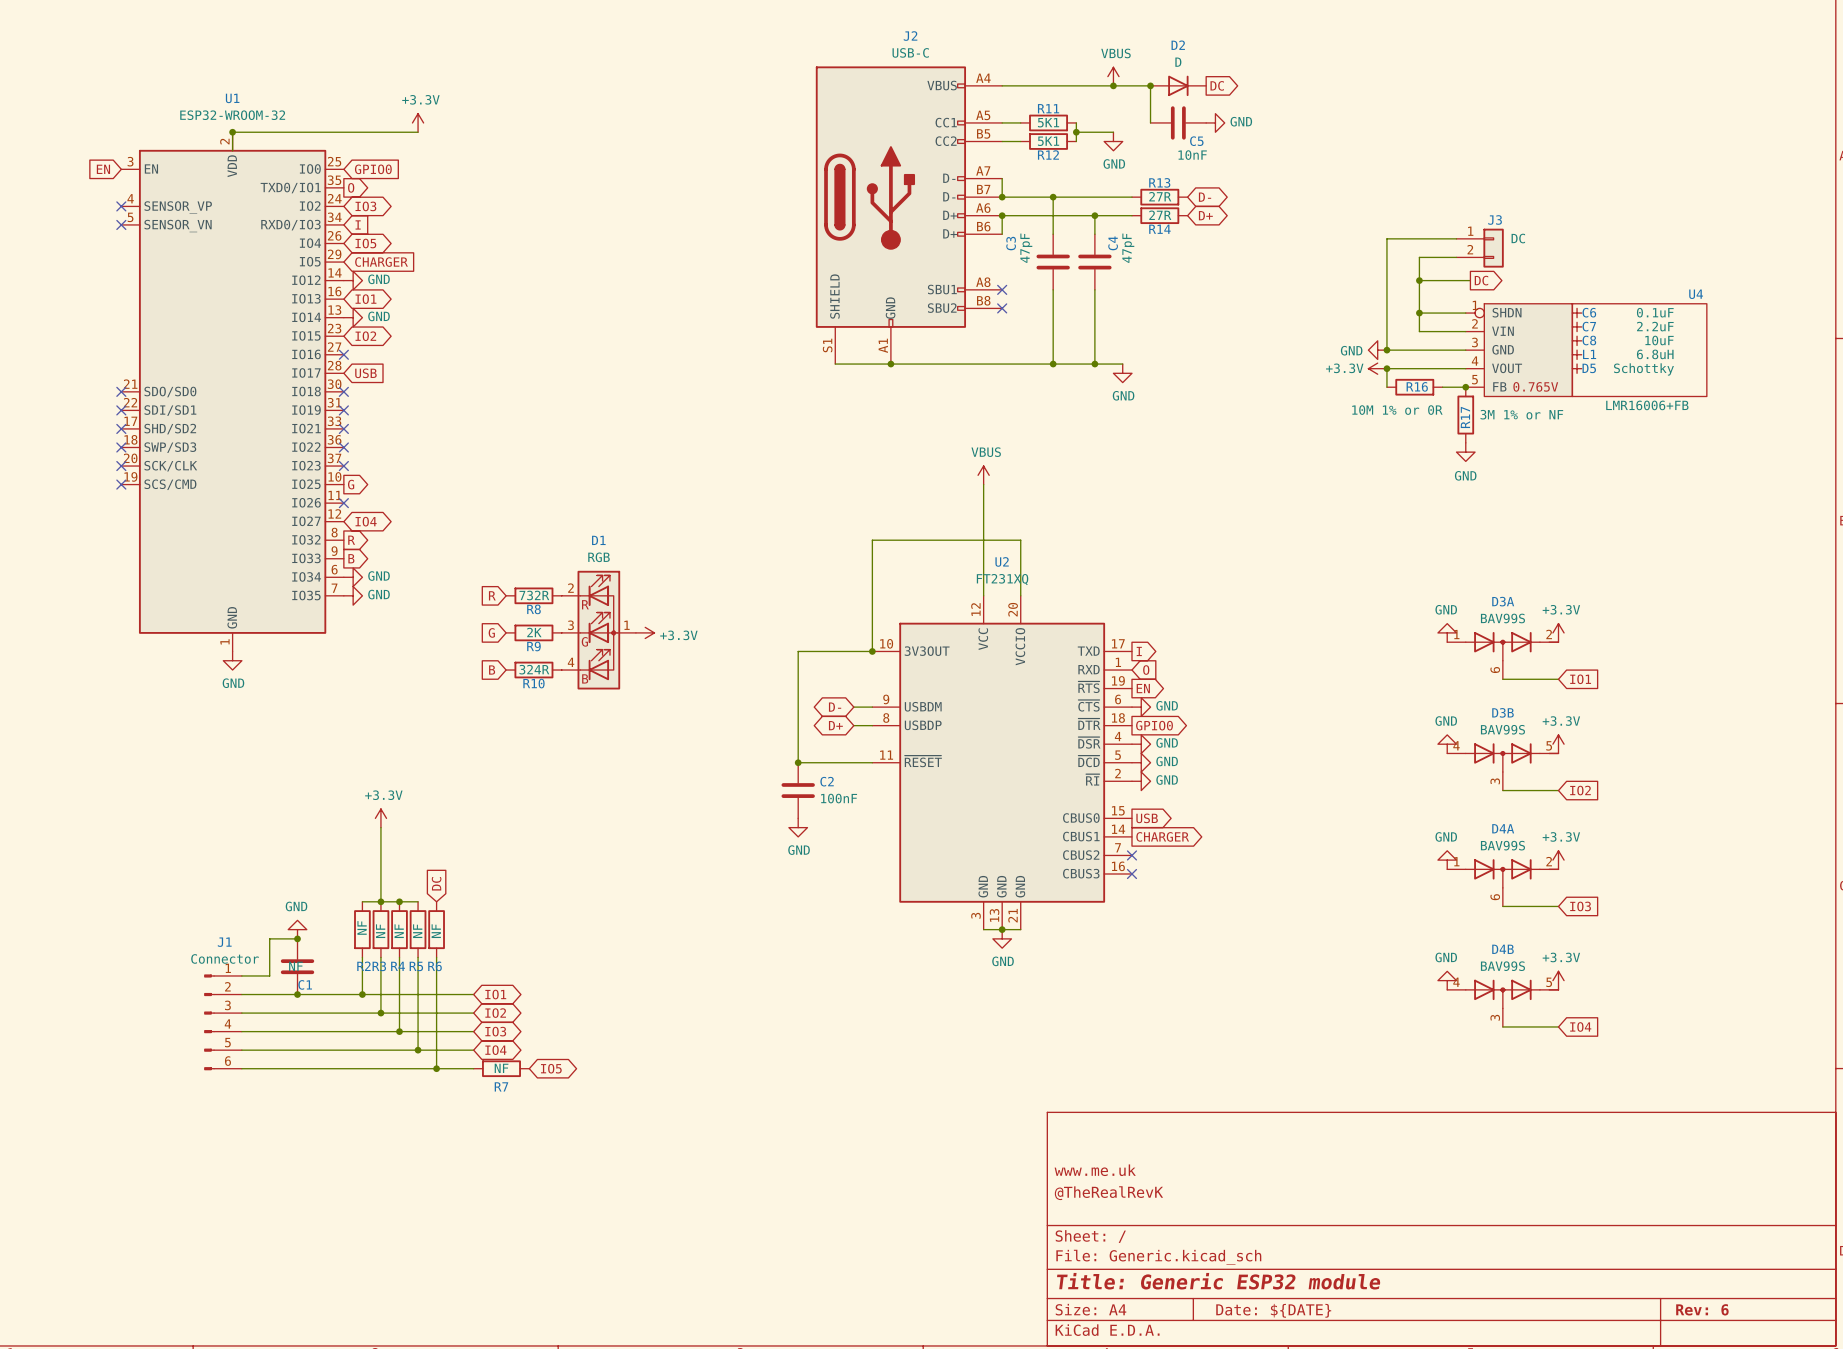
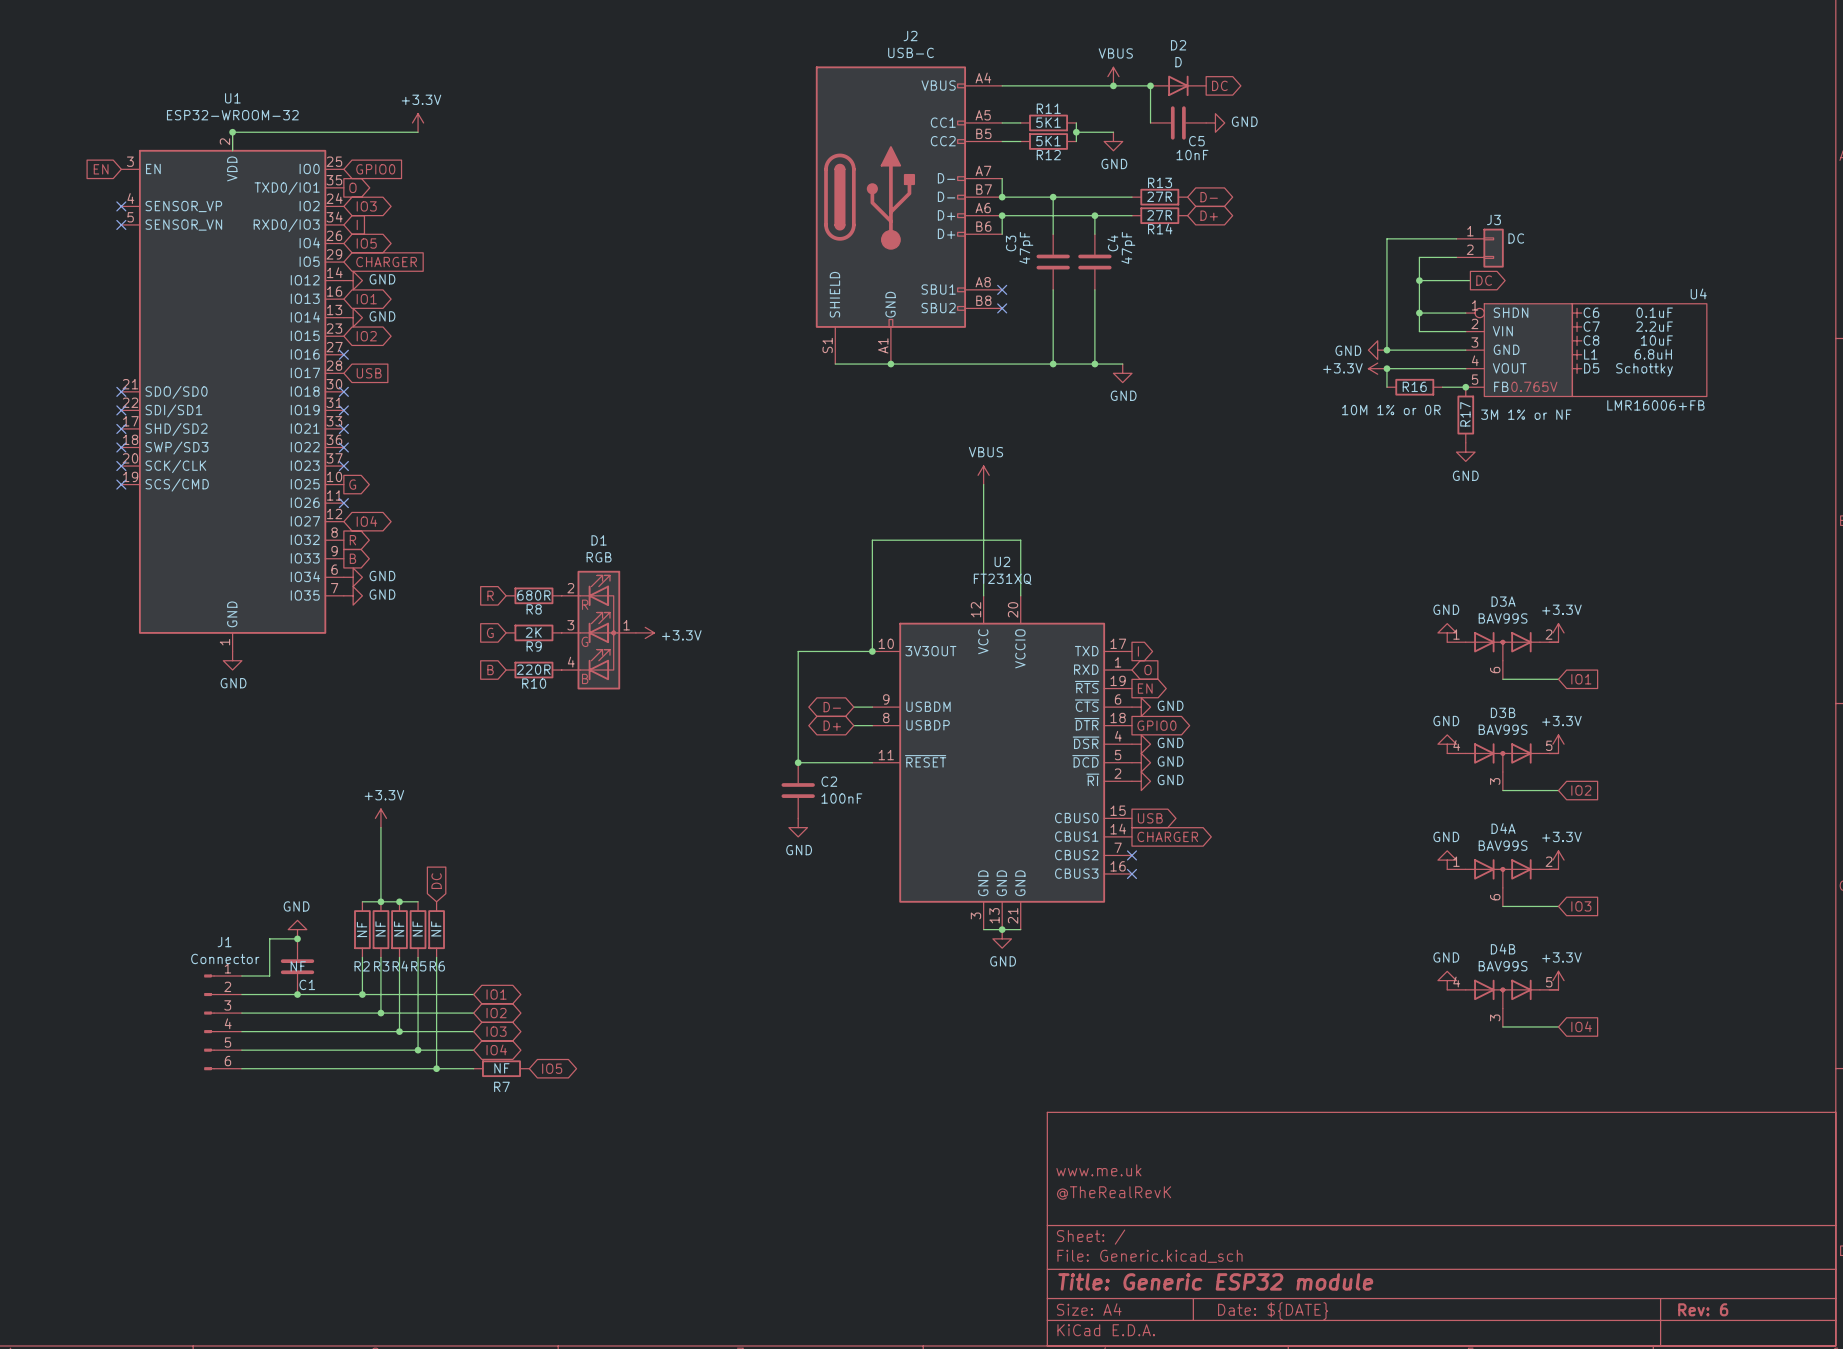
R8 value: 732R (534, 595) -> 680R (533, 595)
R10 value: 324R (534, 669) -> 220R (533, 669)

